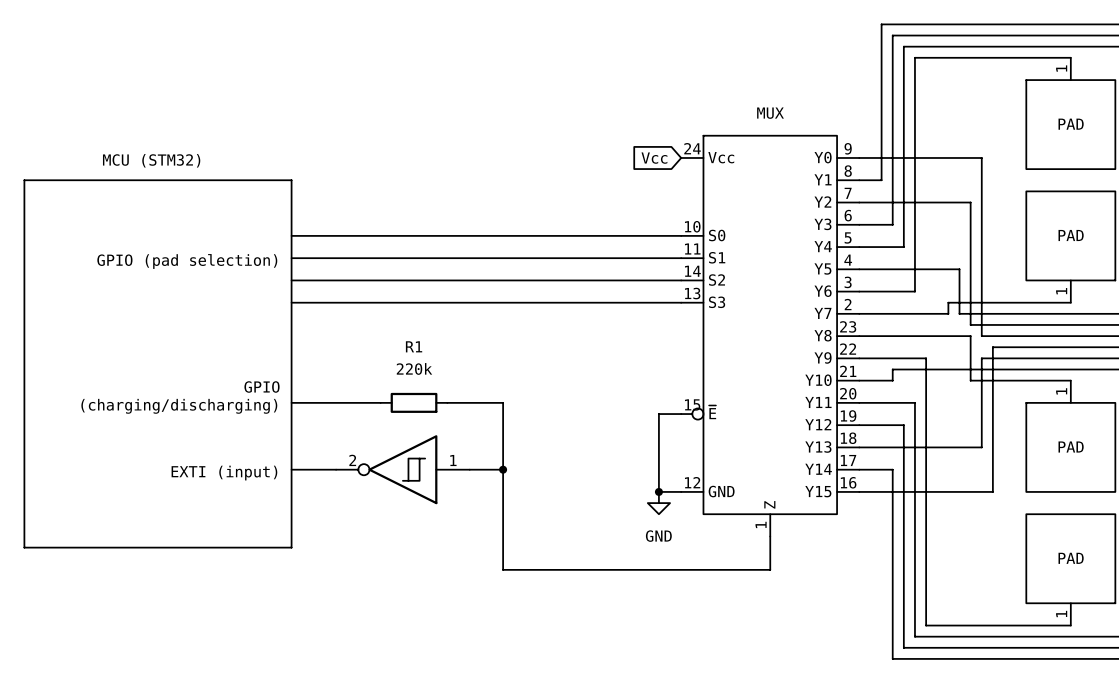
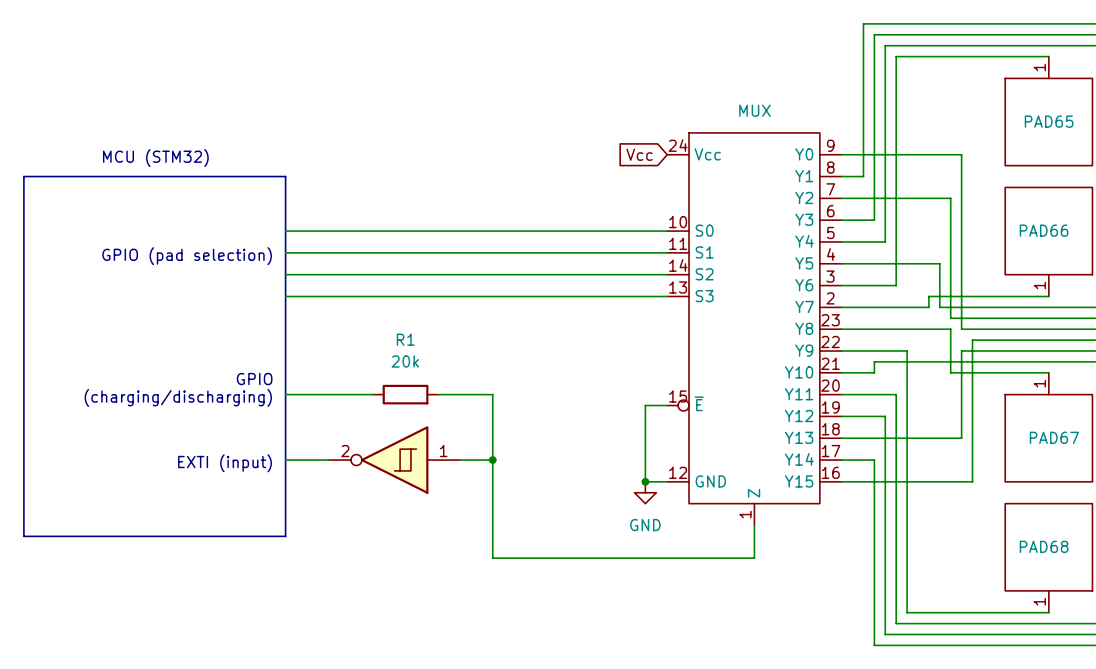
PAD name: PAD (1071, 124) -> PAD65 (1049, 121)
PAD name: PAD (1071, 235) -> PAD66 (1044, 230)
R1 value: 220k (414, 368) -> 20k (405, 361)
PAD name: PAD (1071, 447) -> PAD67 (1054, 437)
PAD name: PAD (1071, 558) -> PAD68 (1044, 546)

